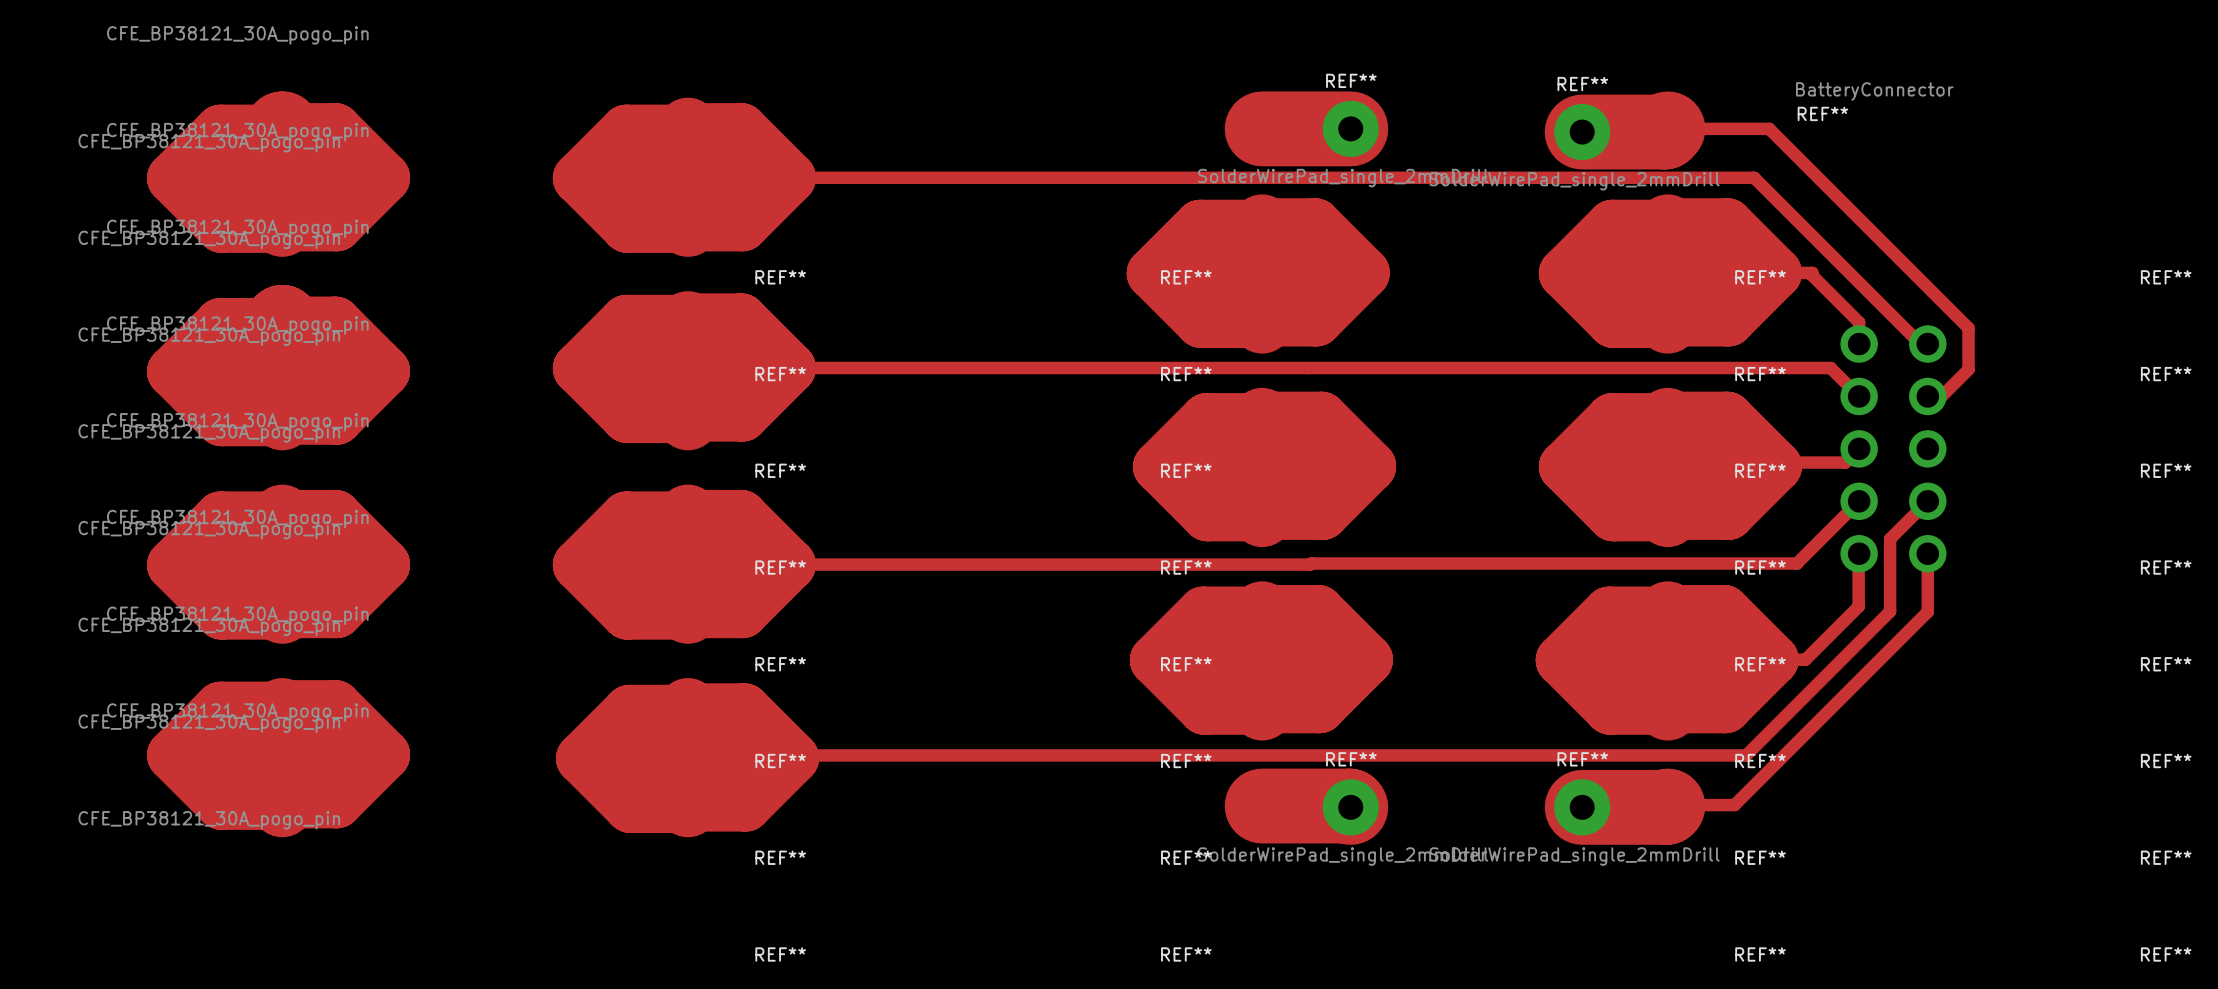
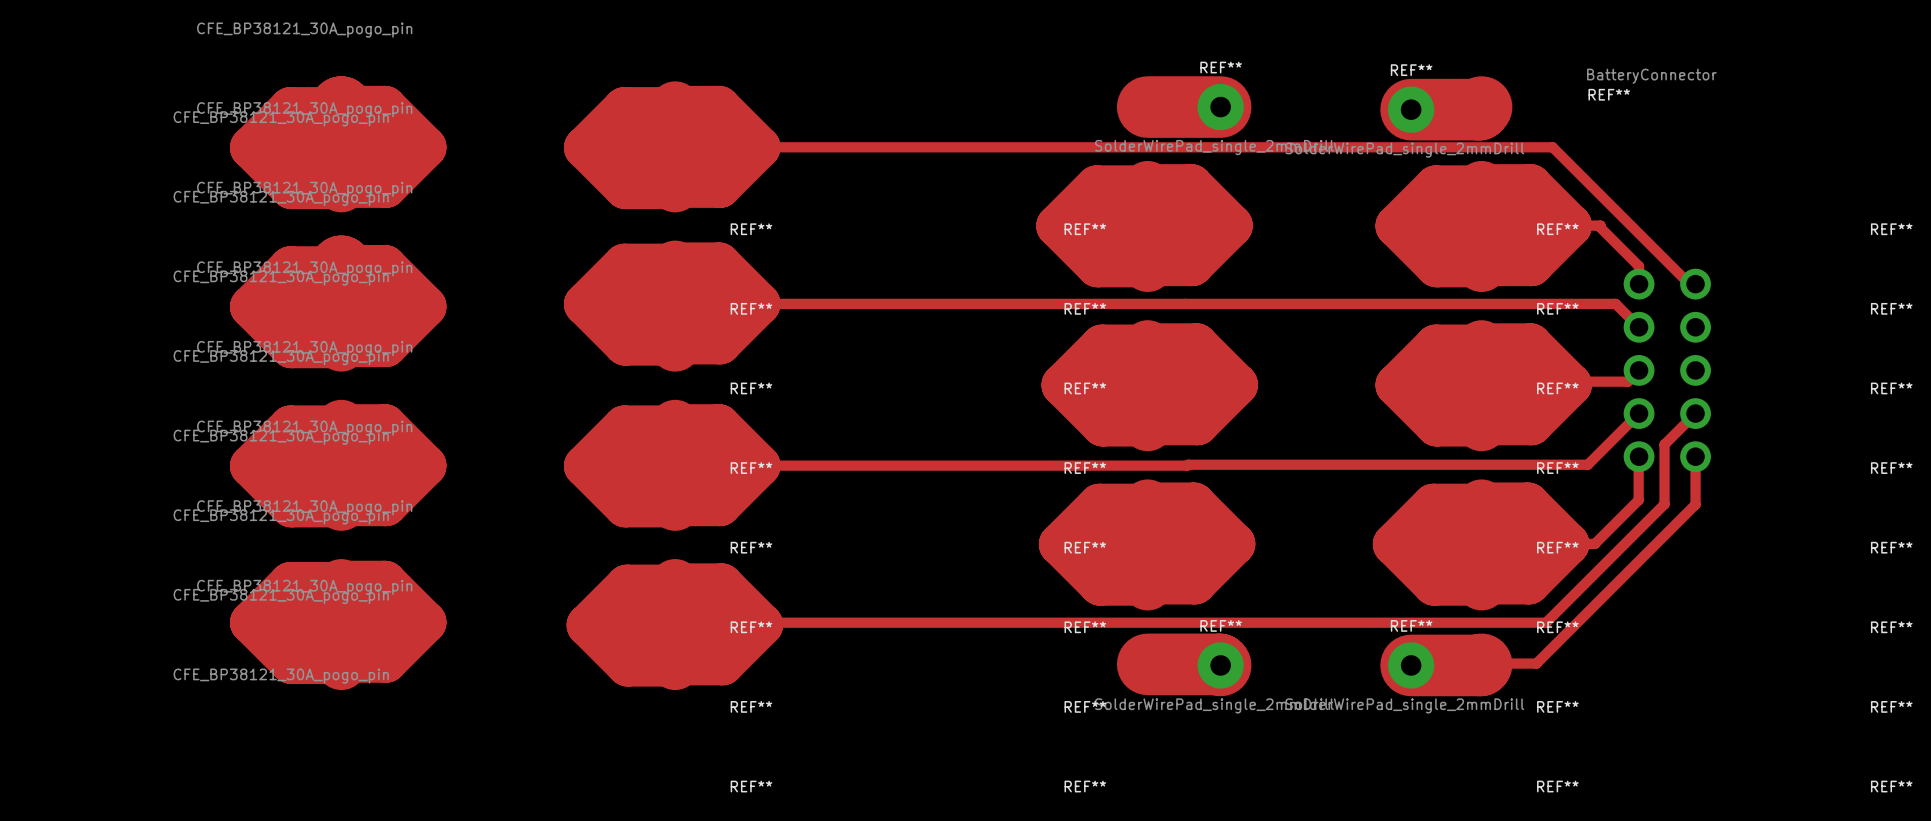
top track: (1667, 128) (1769, 128) (1968, 328) (1968, 369) (1941, 396) (1927, 396) -> none

